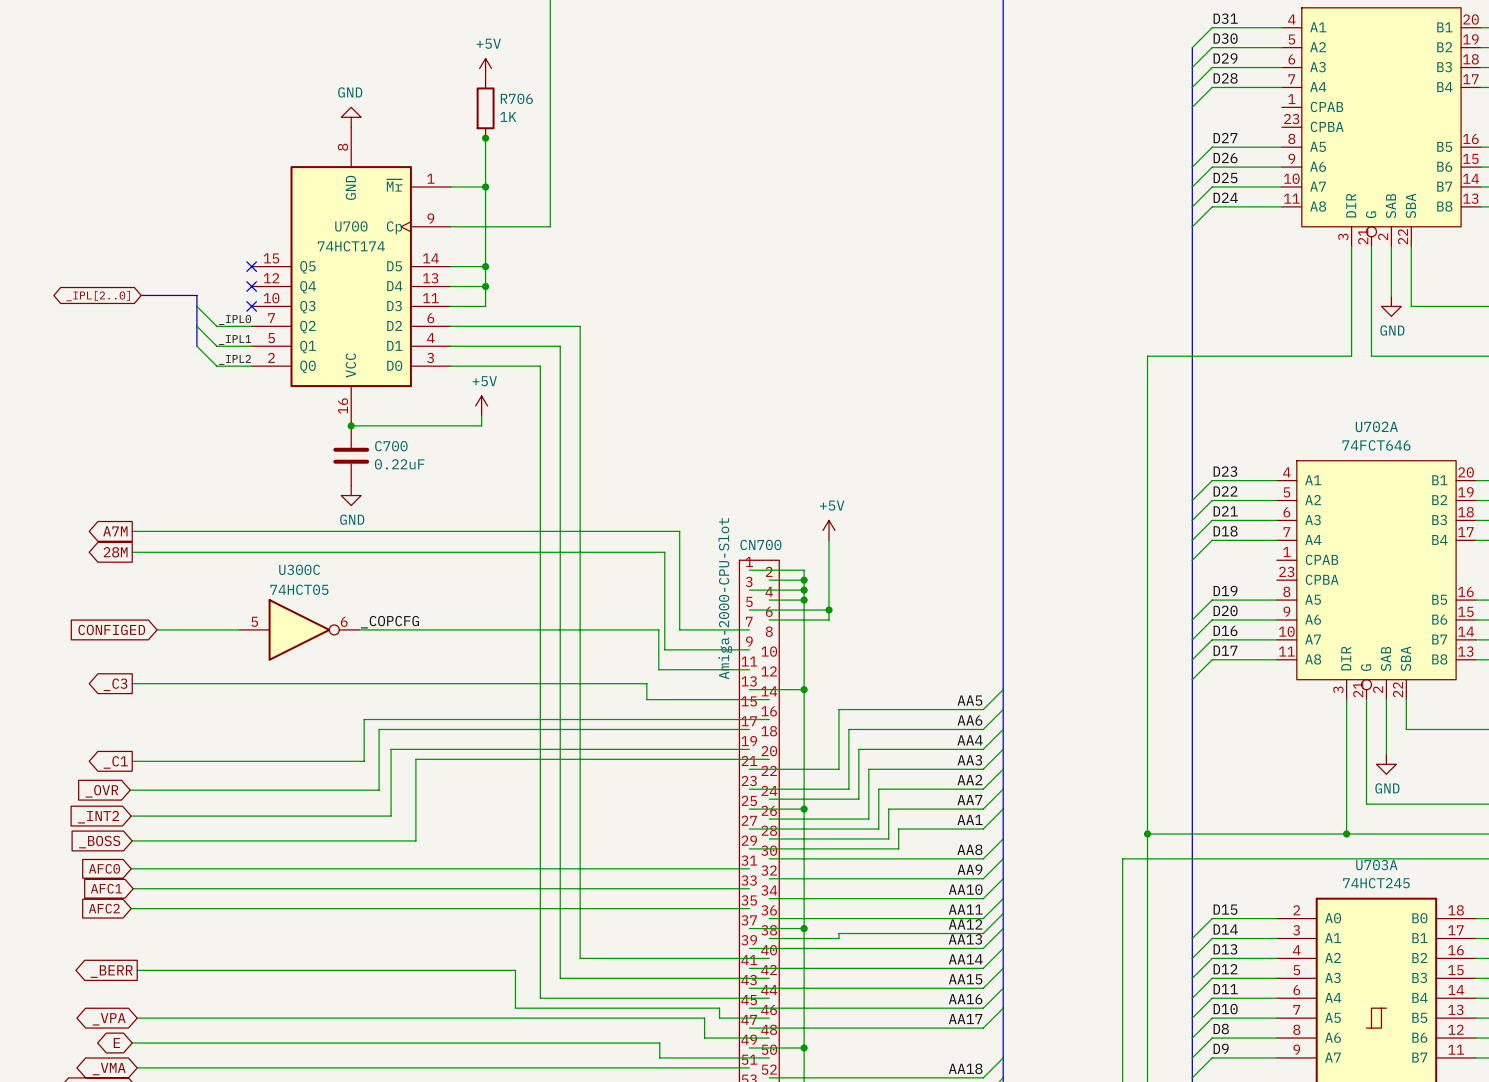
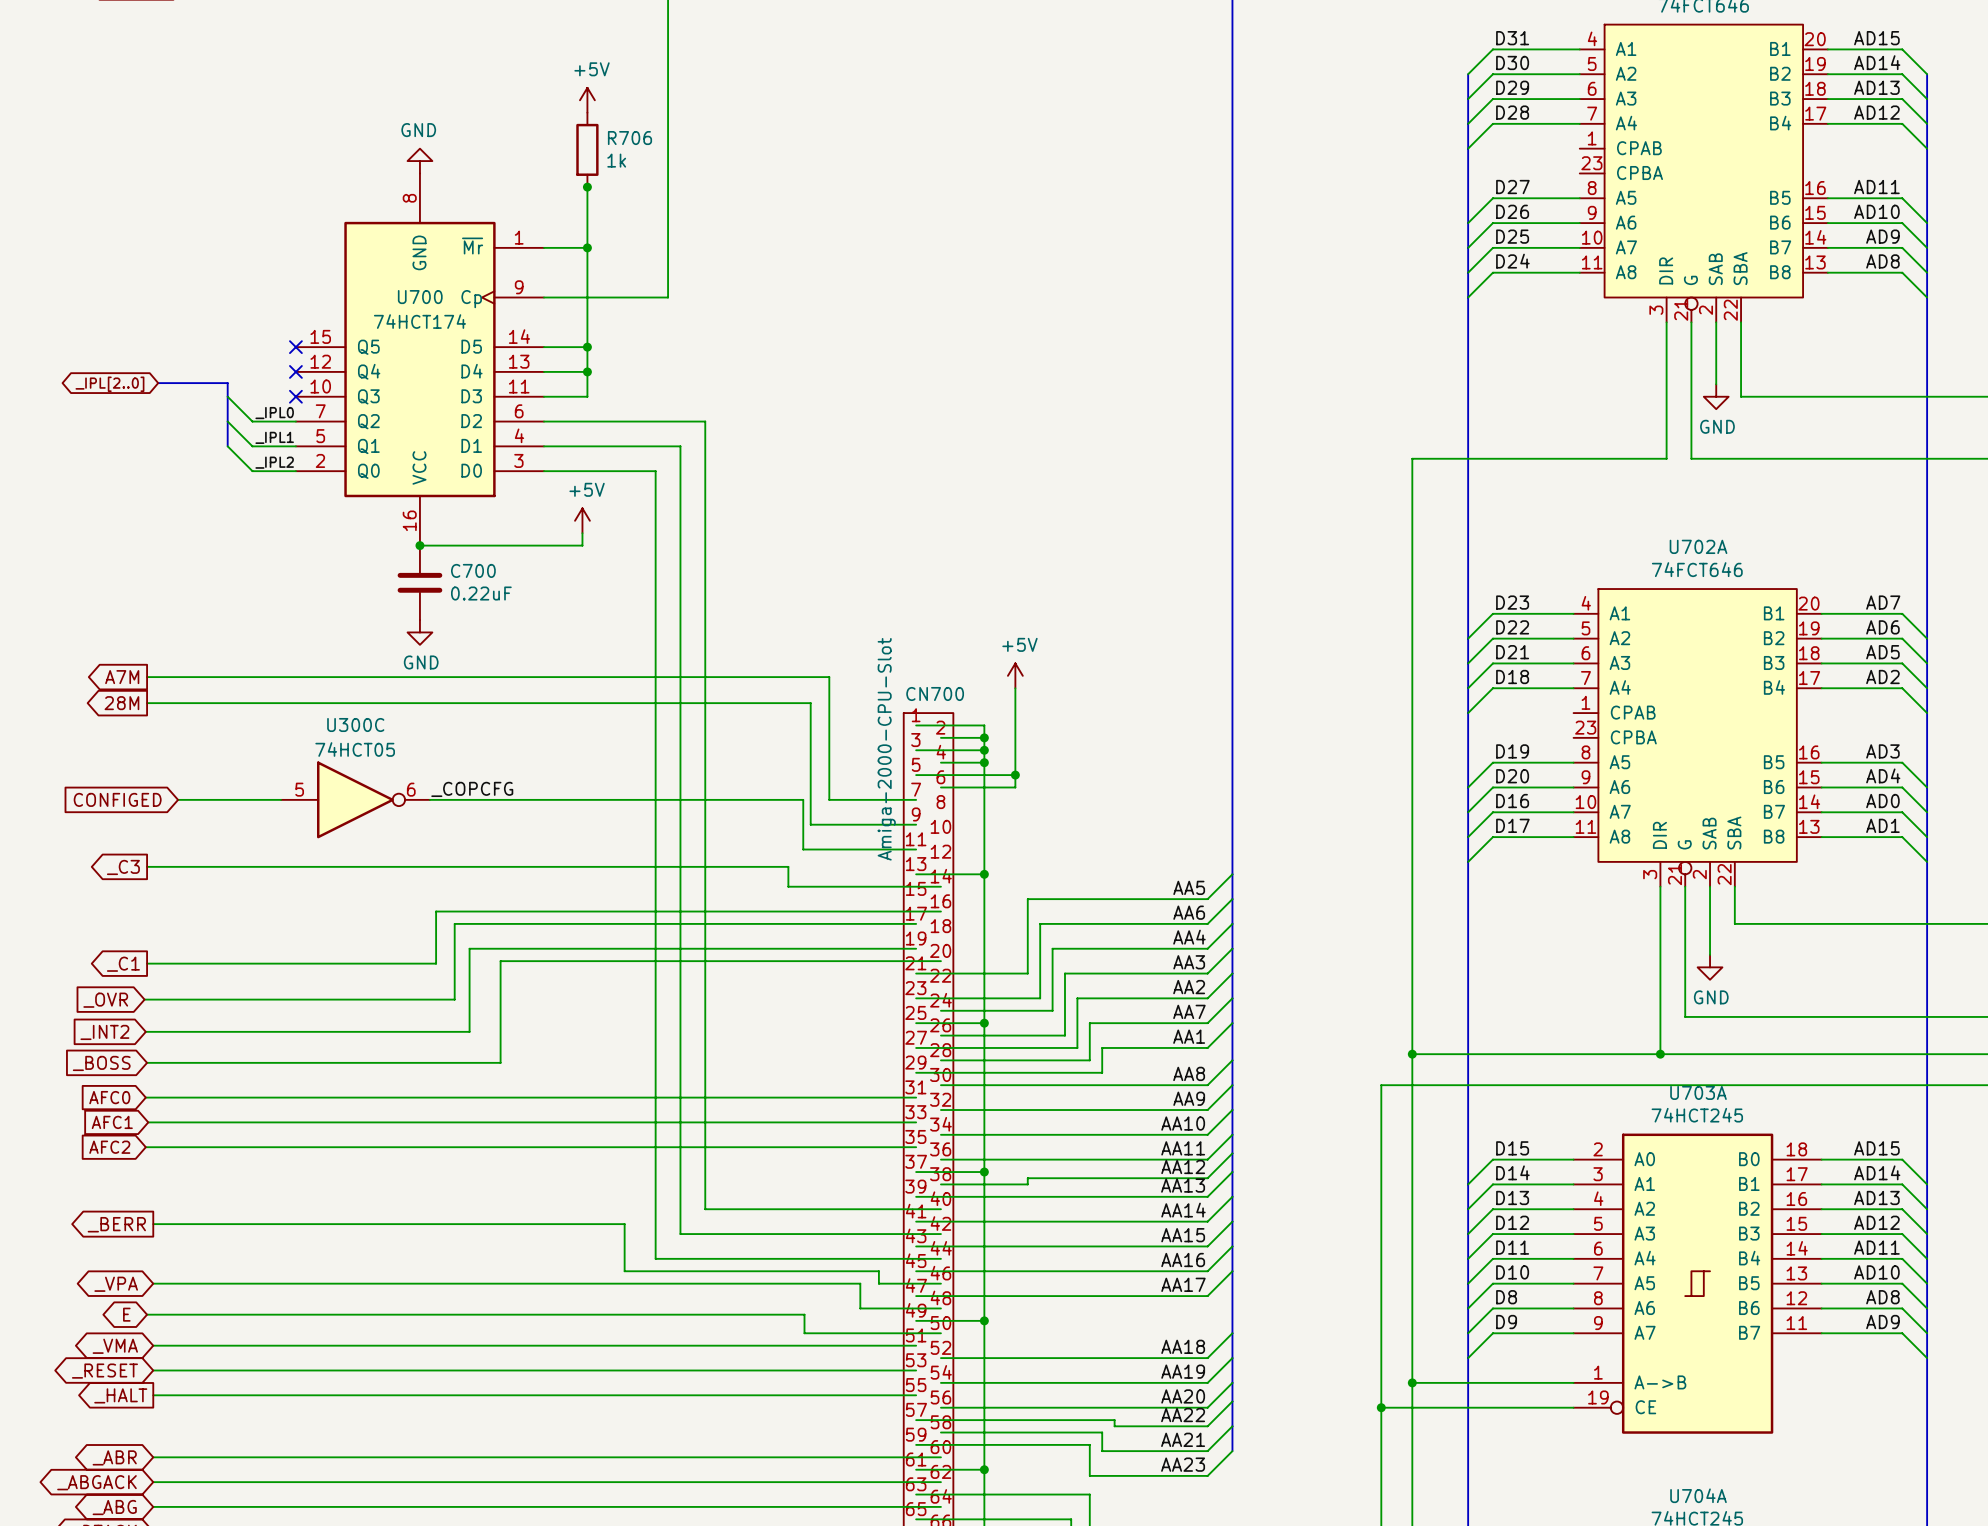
R706 value: 1K (508, 116) -> 1k (616, 160)

